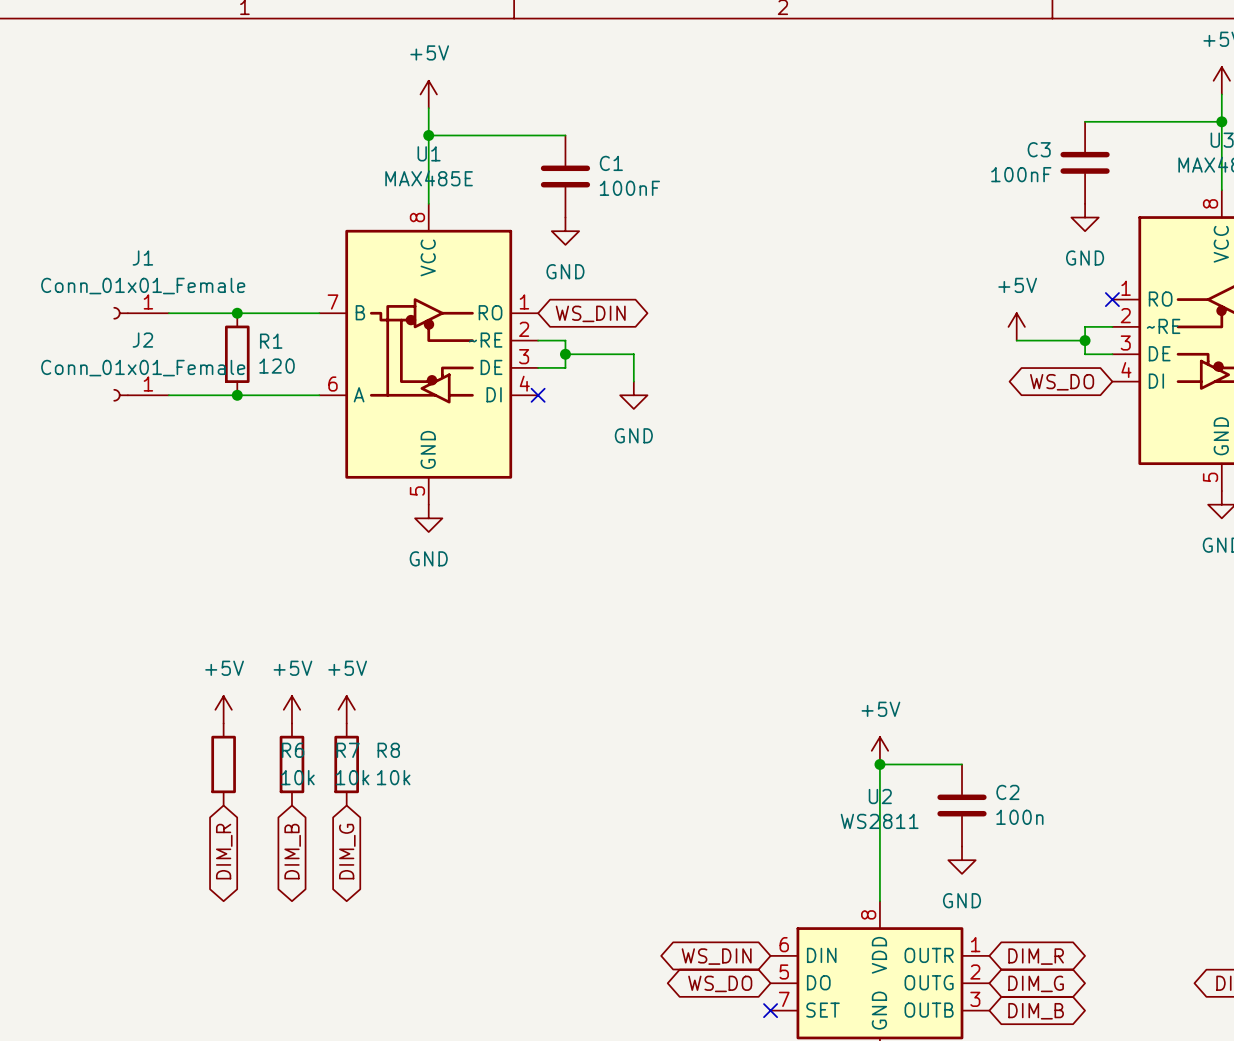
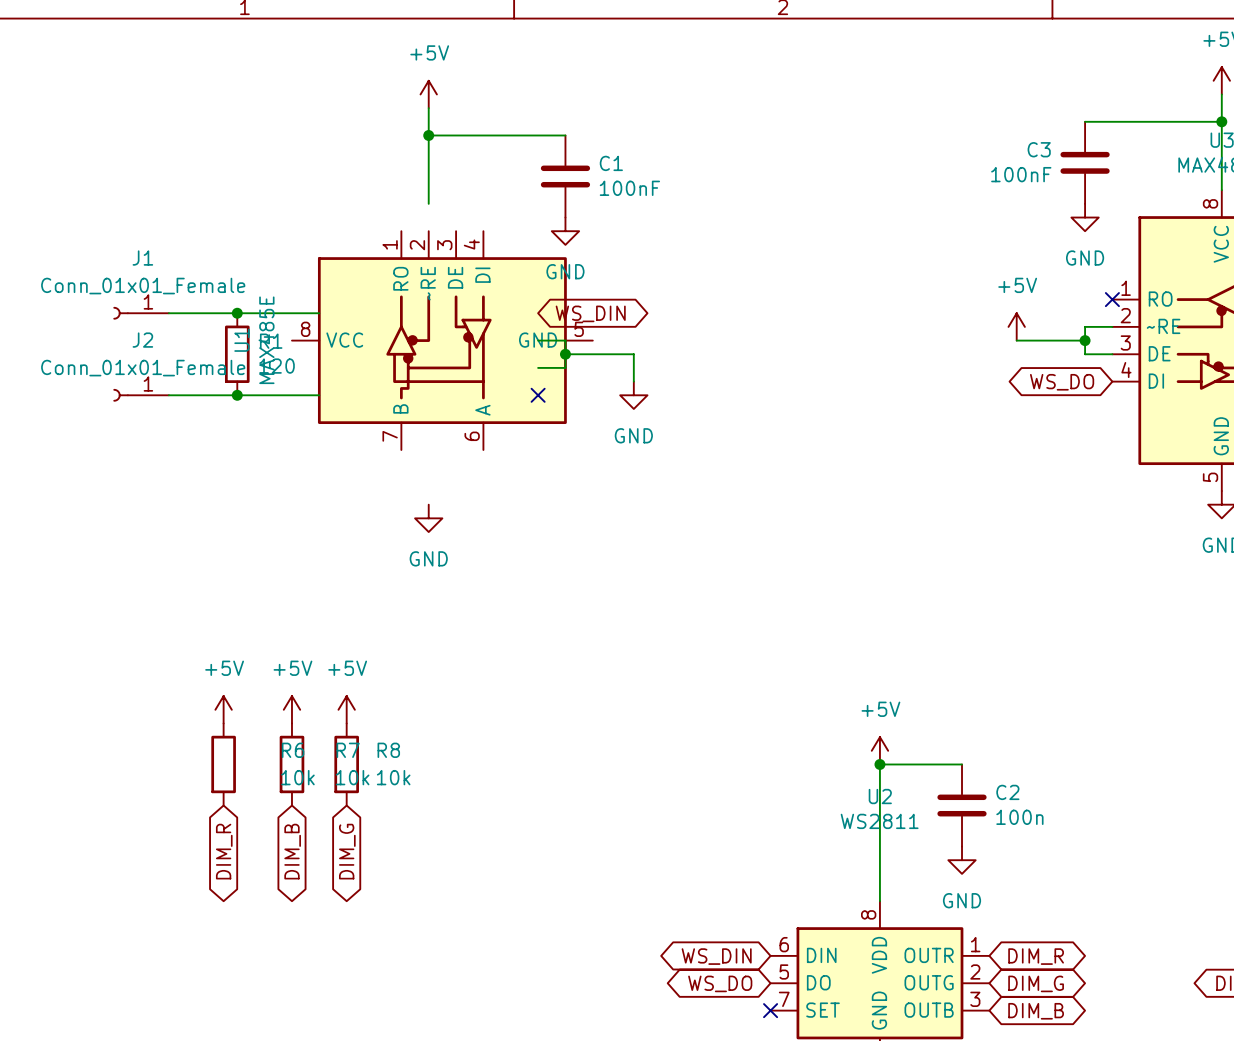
U1 rotation: 0° (428, 354) -> 90° counterclockwise (442, 340)

